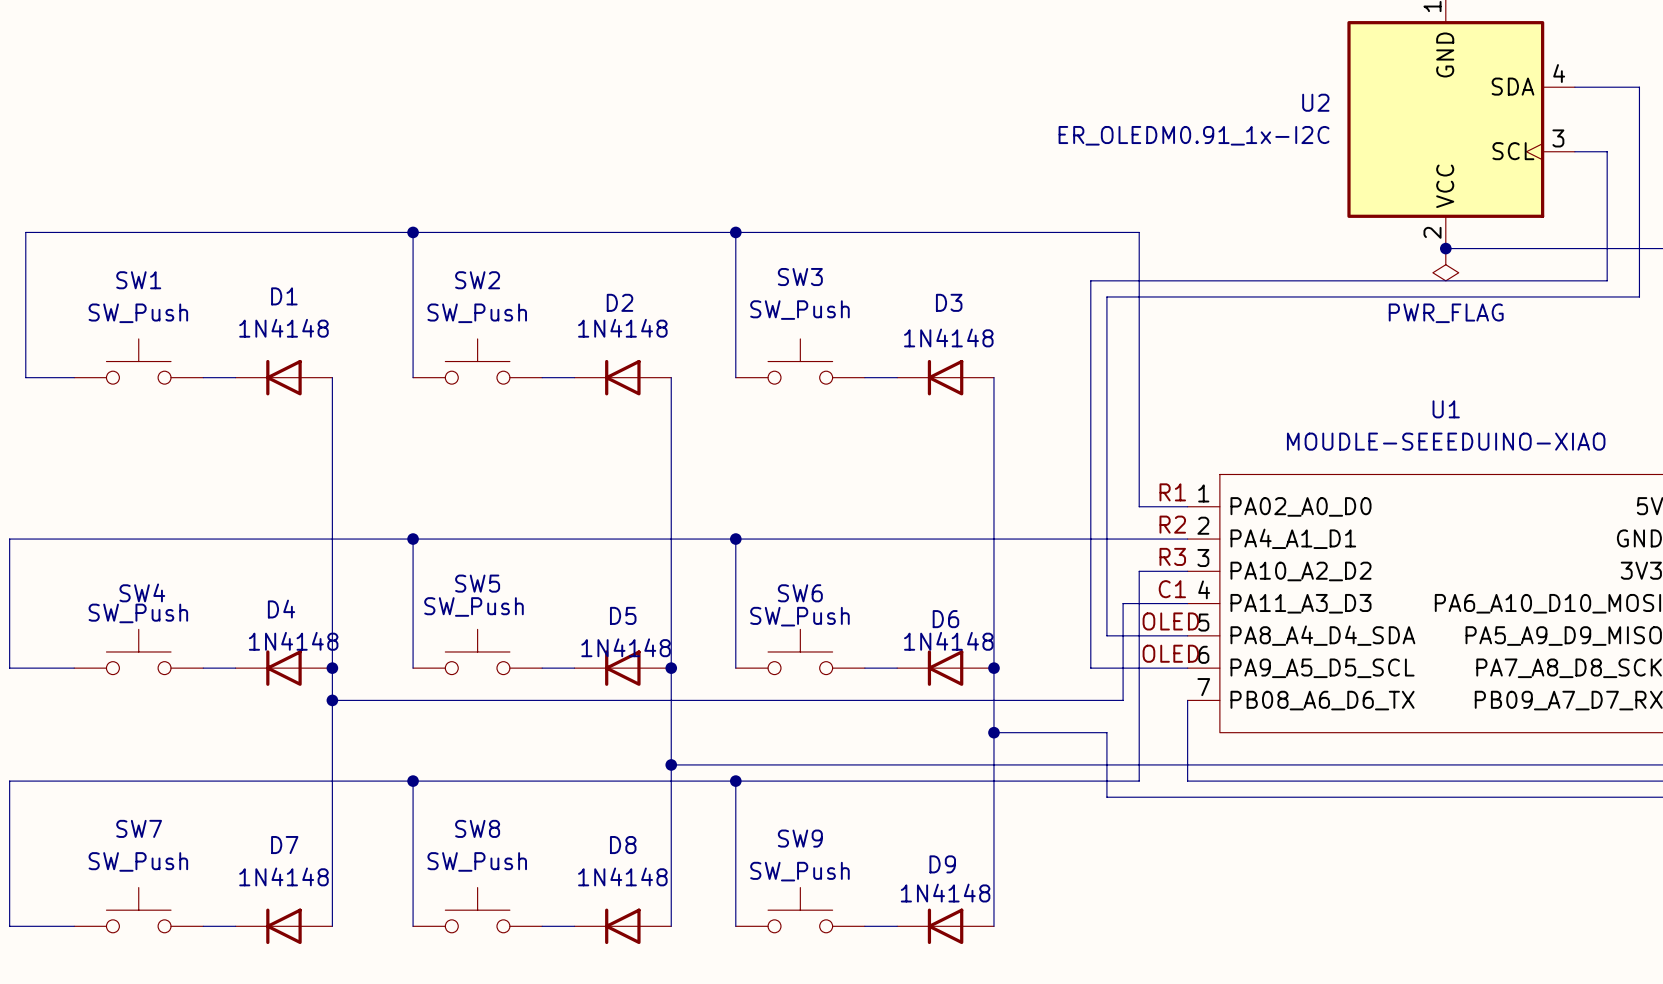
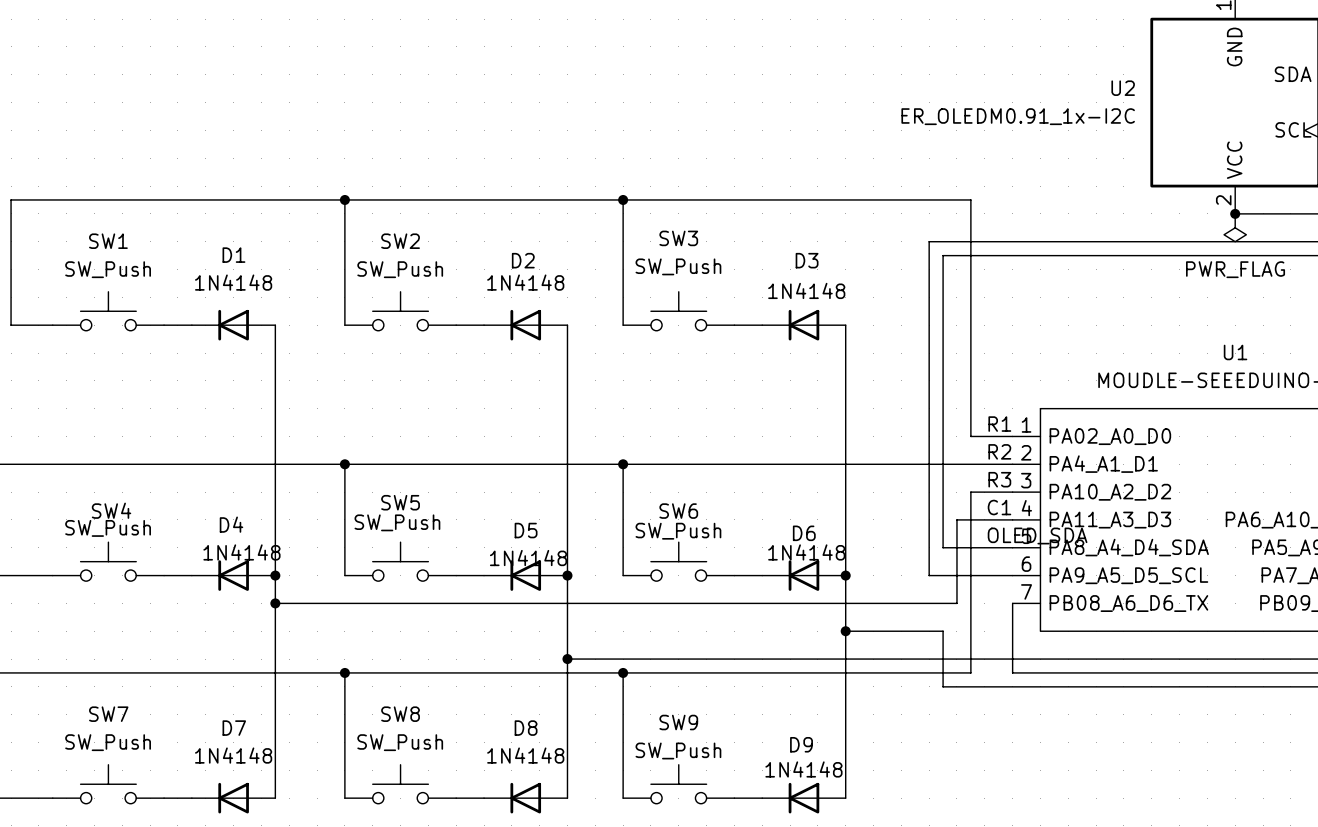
label: OLED (1170, 621) -> OLED_SDA (1037, 536)
label: OLED (1170, 653) -> none

